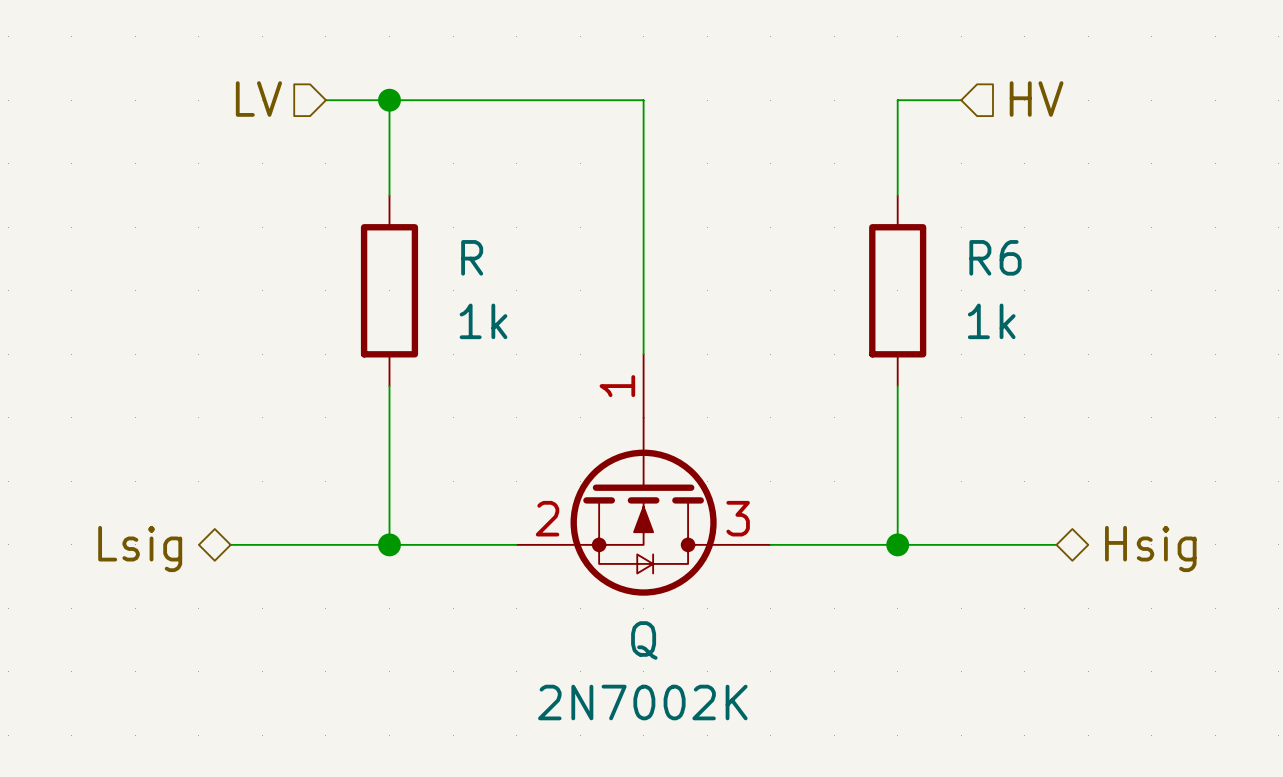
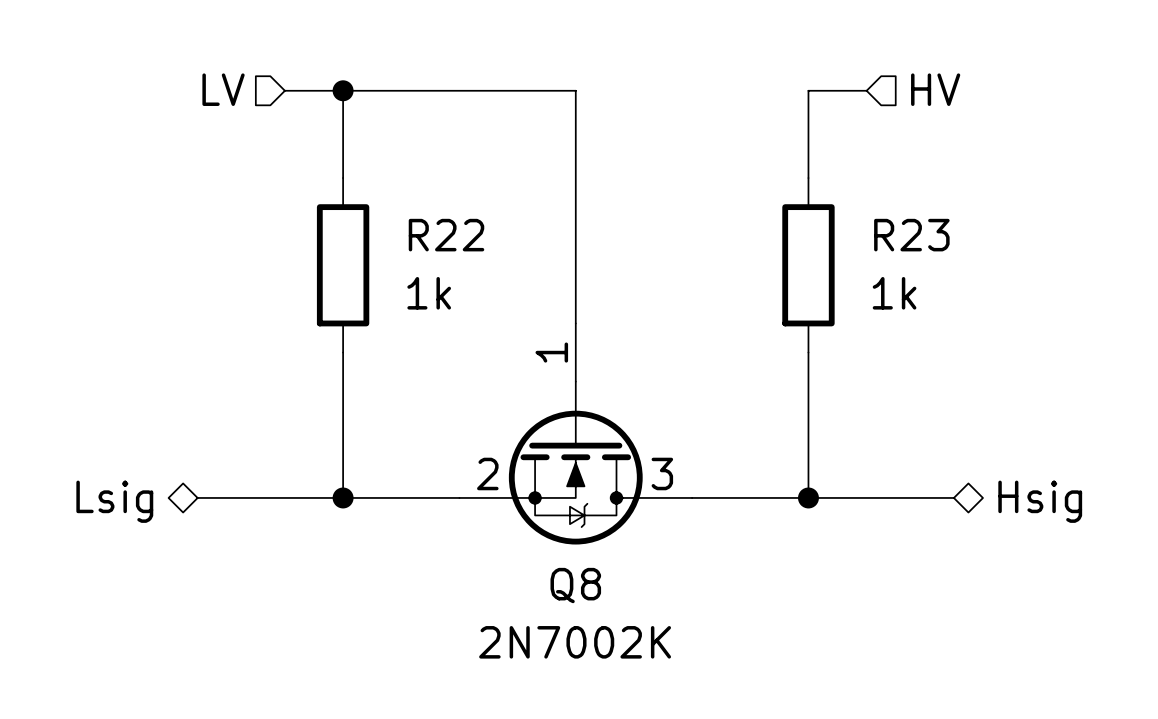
R name: R (472, 257) -> R22 (446, 235)
R6 name: R6 (995, 257) -> R23 (911, 235)
Q: 2N7002K (643, 475) -> none
Q8: none -> 2N7002K (575, 433)

